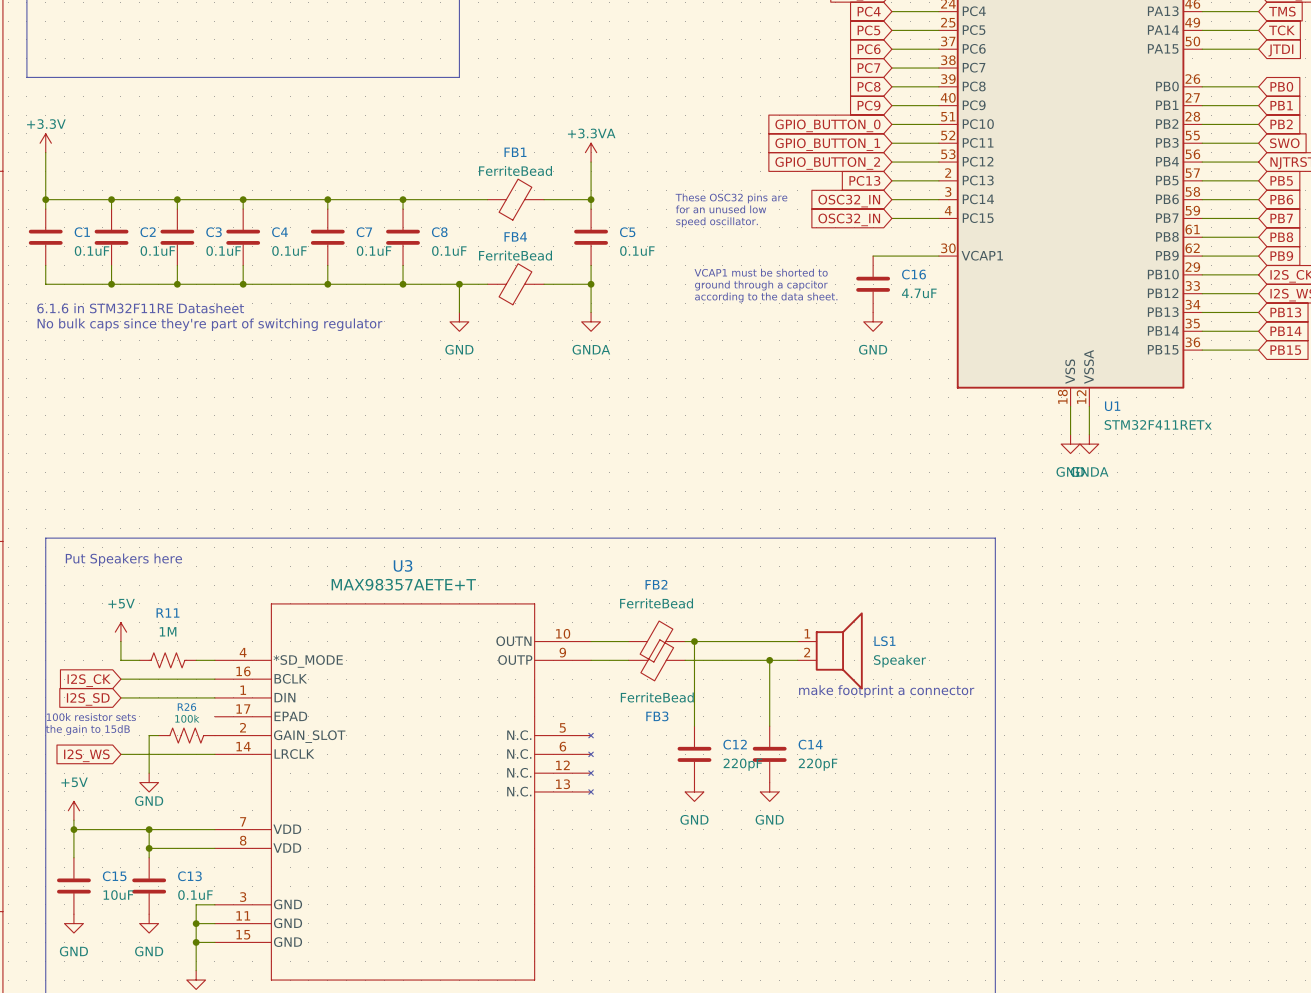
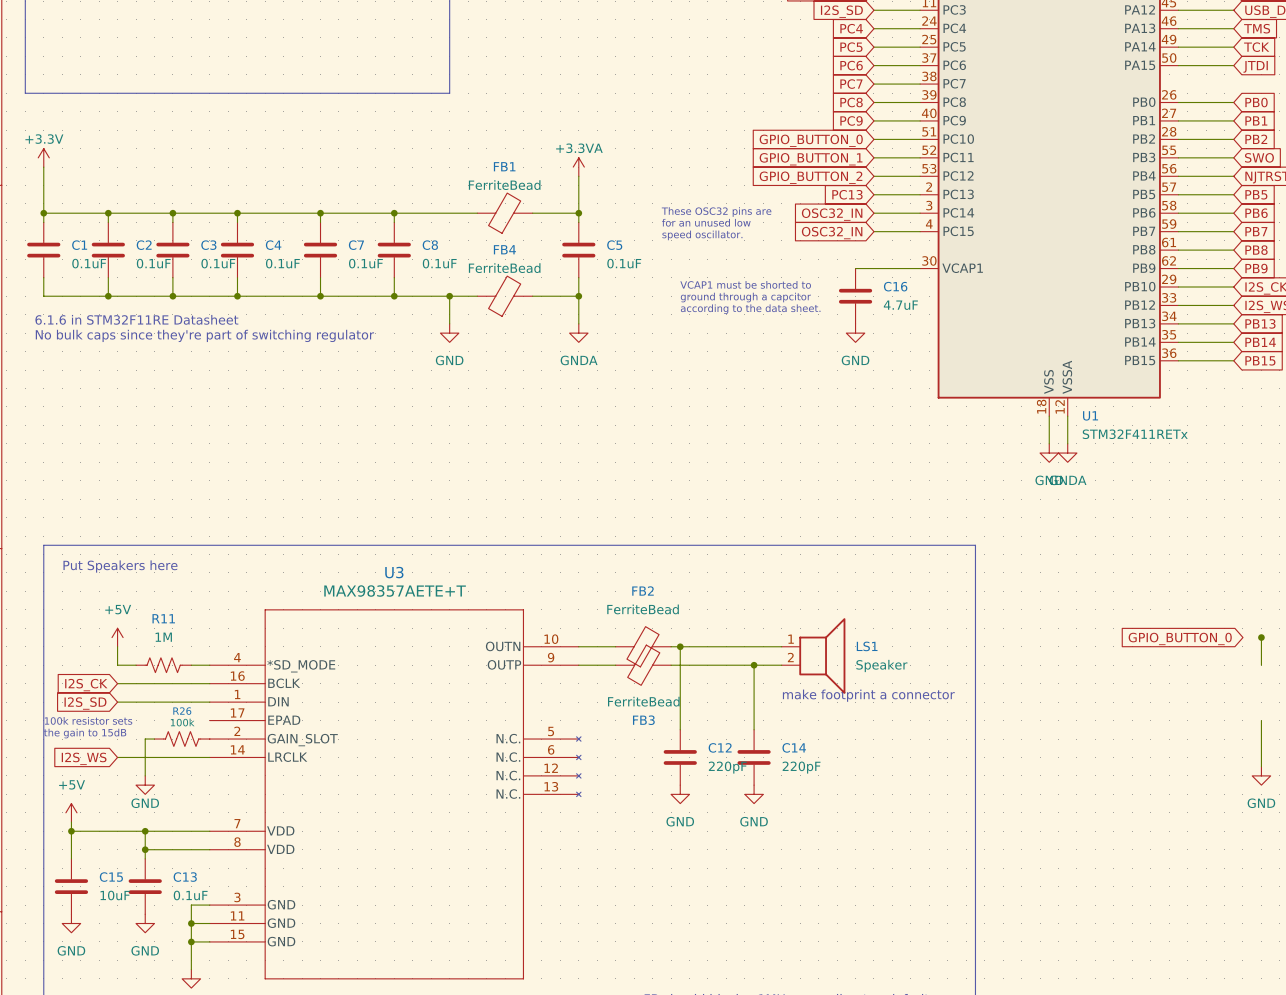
wire: none -> (1261, 637) (1261, 665)
junction: none -> (1261, 637)
global label: none -> GPIO_BUTTON_0 (1180, 638)
wire: none -> (1261, 720) (1261, 766)
power symbol: none -> GND (1261, 775)

